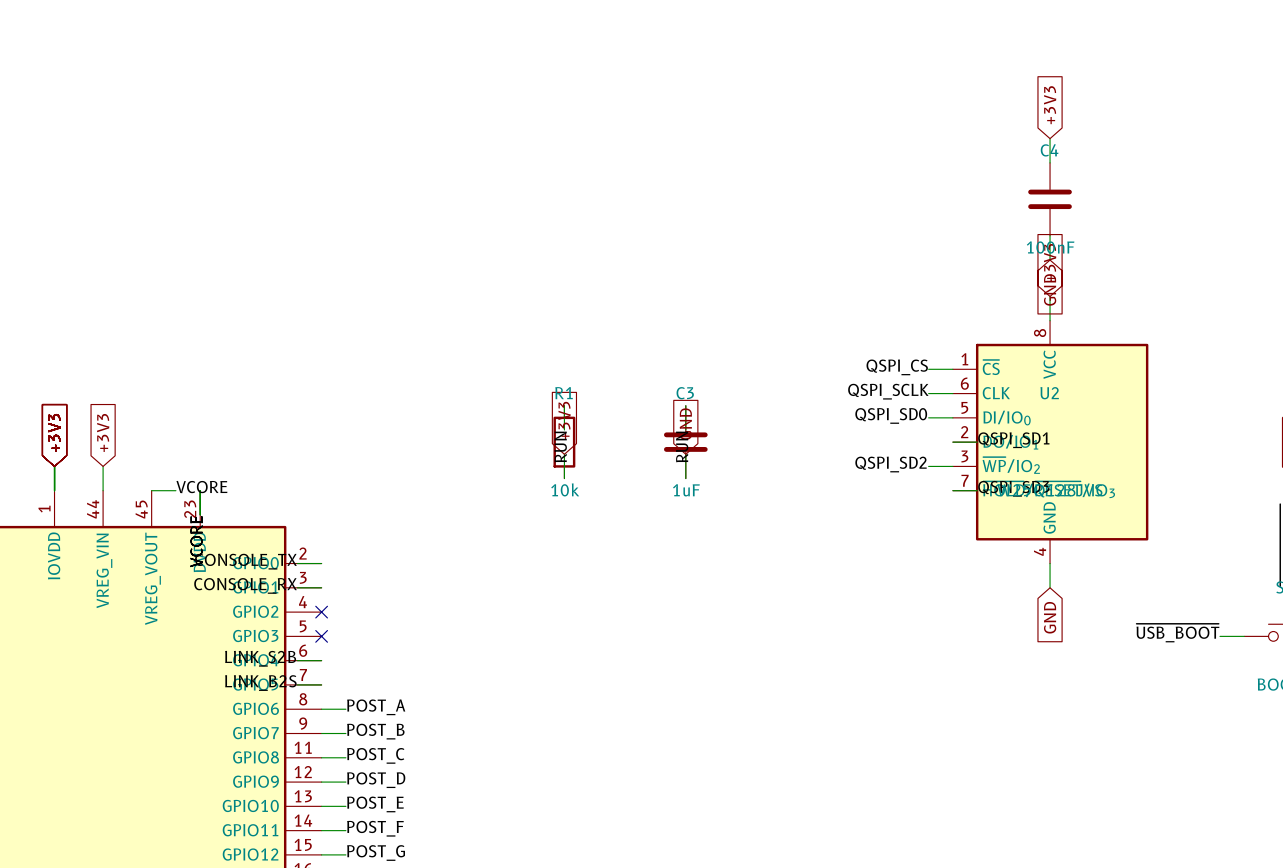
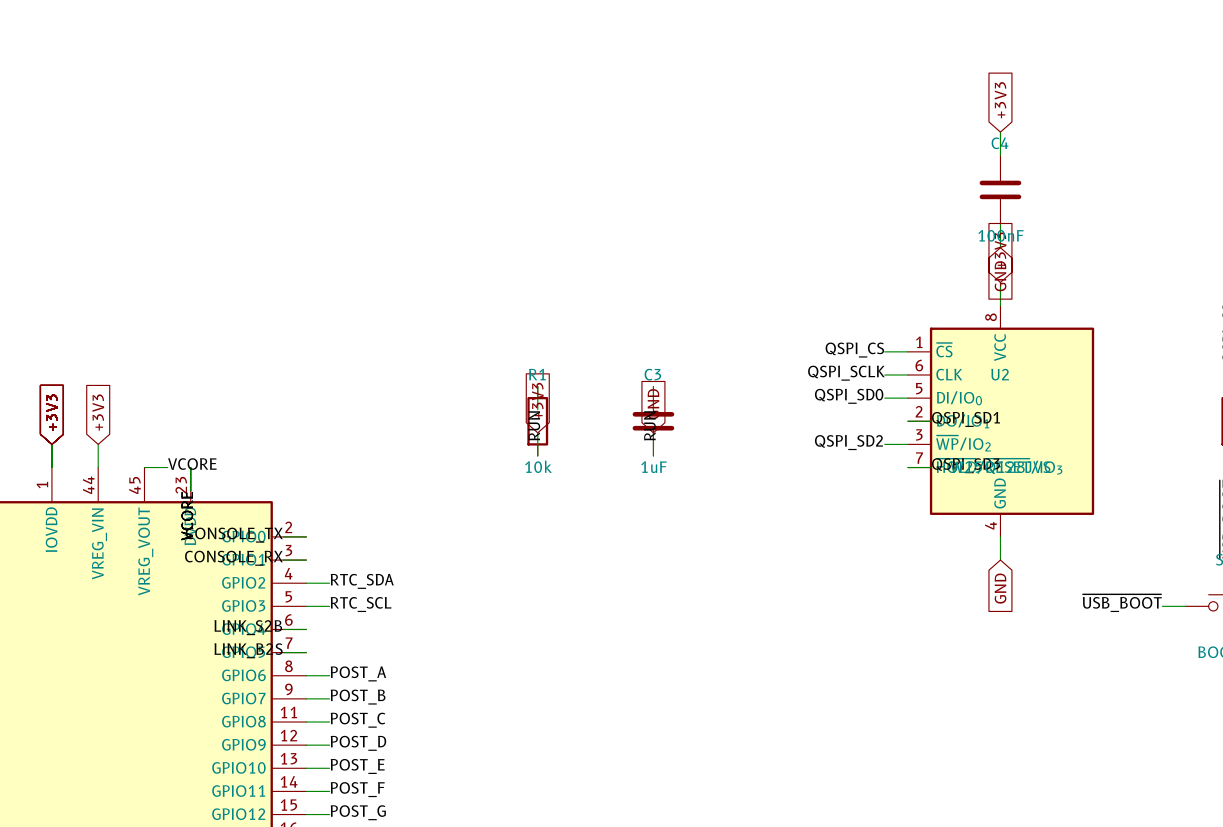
label: none -> RTC_SDA (362, 581)
wire: none -> (306, 583) (329, 583)
no-connect mark: (321, 612) -> none
label: none -> RTC_SCL (361, 604)
wire: none -> (306, 606) (329, 606)
no-connect mark: (321, 636) -> none

